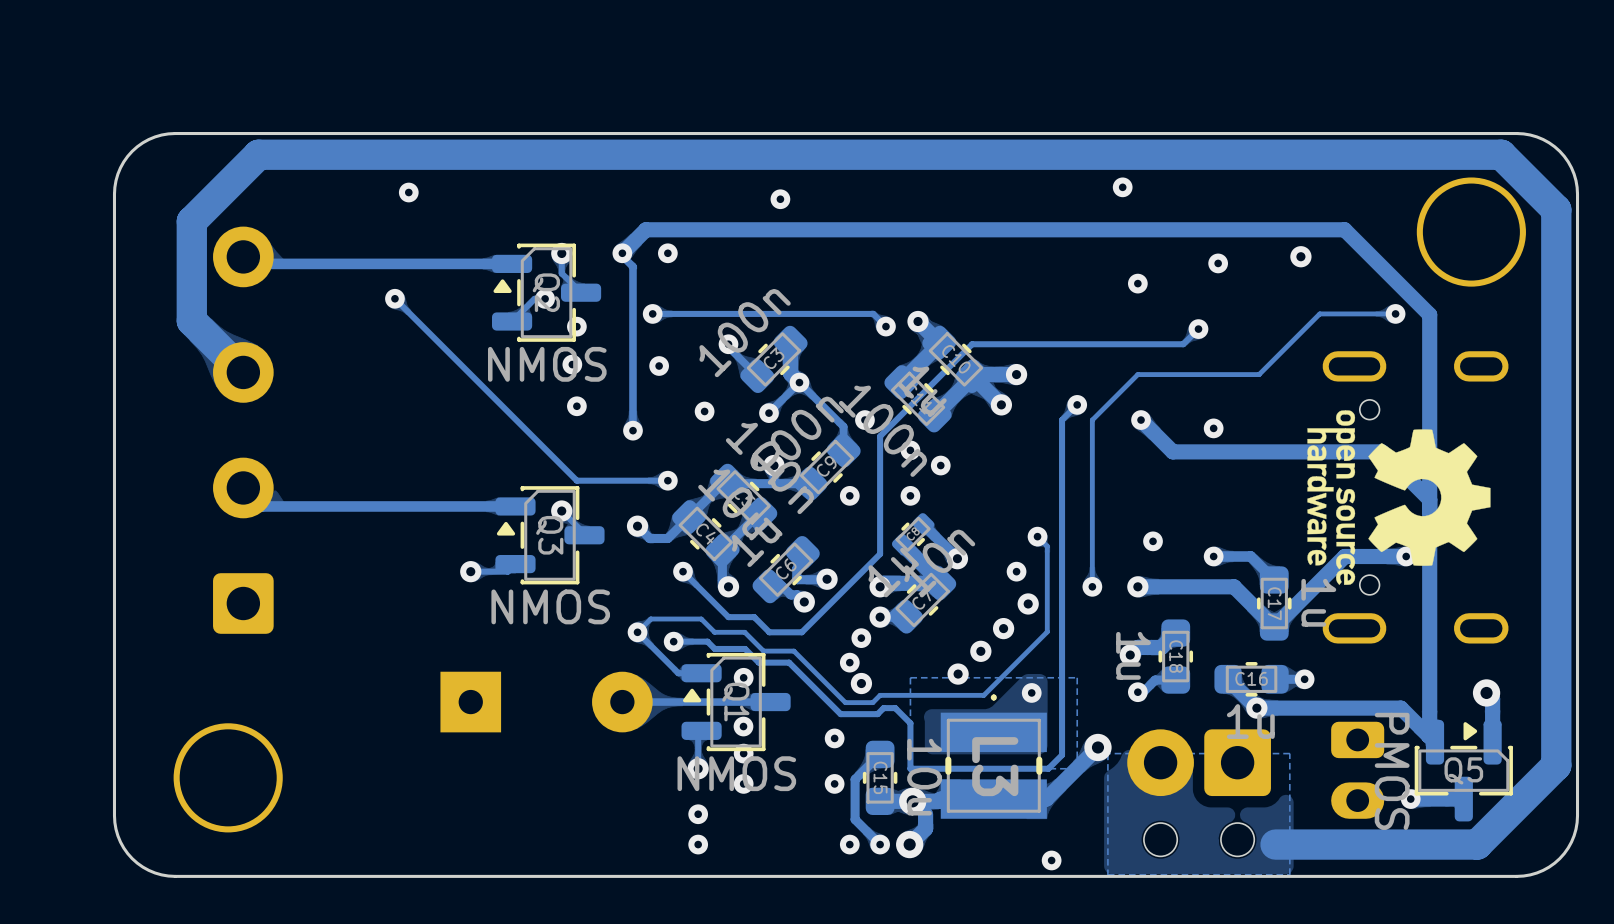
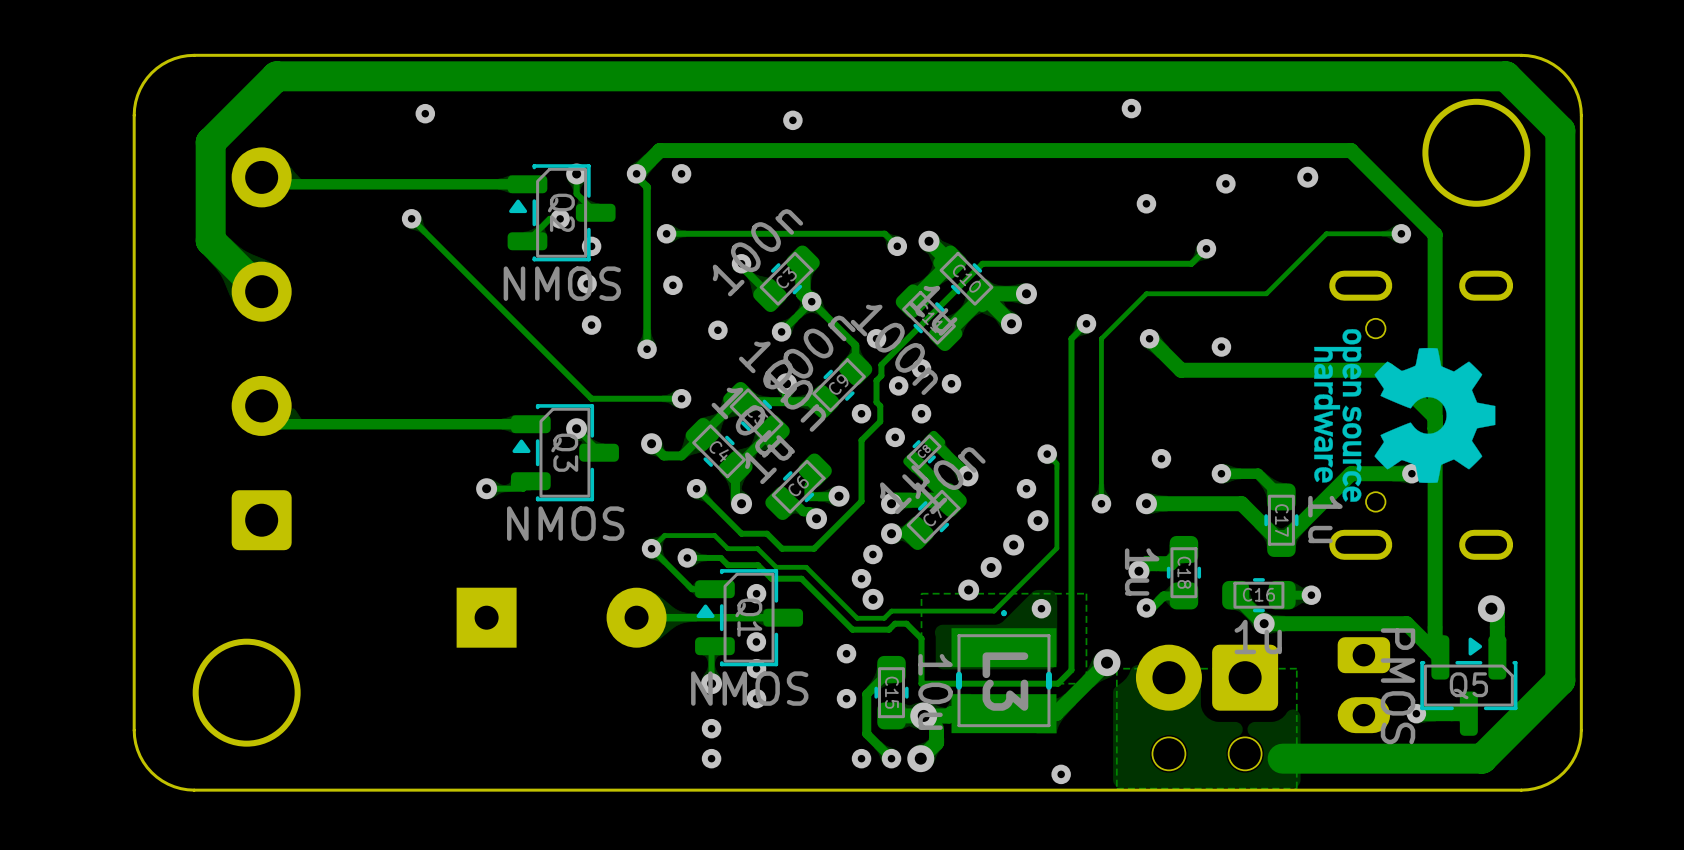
track: (880, 436) (880, 554) (849, 584) -> (891, 354) (881, 364) (881, 375) (876, 380) (876, 402) (880, 405) (880, 421) (861, 440) (861, 501)
via: none -> (898, 385)
via: none -> (895, 437)

